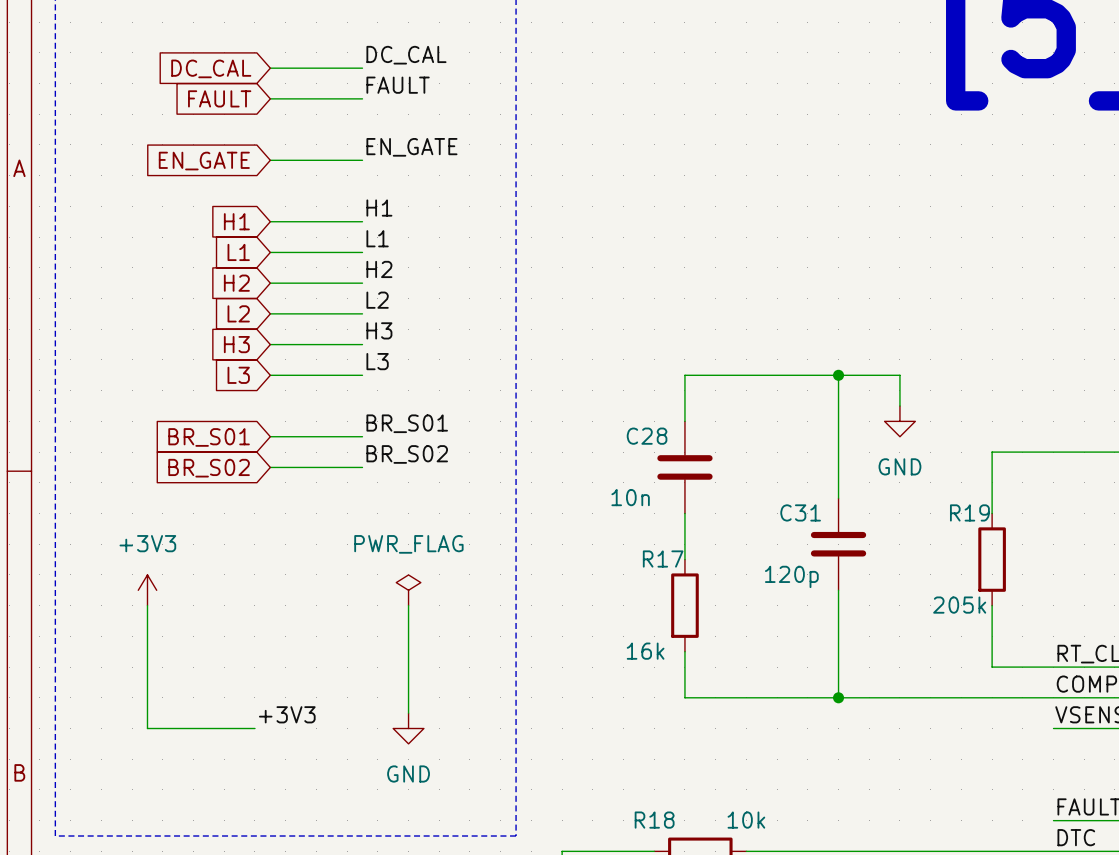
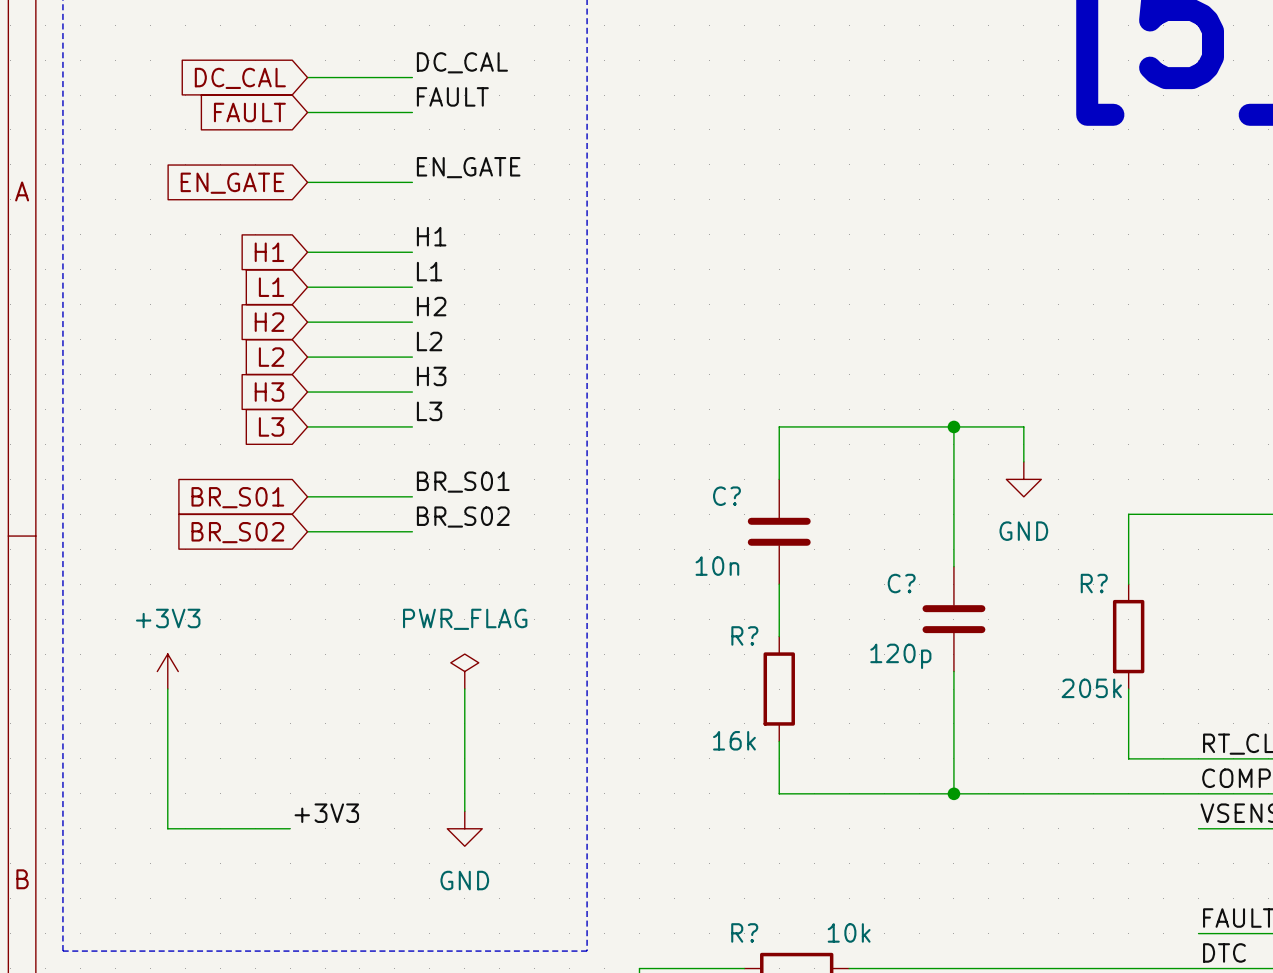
C28 name: C28 (647, 436) -> C? (726, 496)
C31 name: C31 (800, 512) -> C? (901, 583)
R19 name: R19 (969, 512) -> R? (1094, 583)
R17 name: R17 (663, 559) -> R? (744, 635)
R18 name: R18 (654, 820) -> R? (744, 932)

